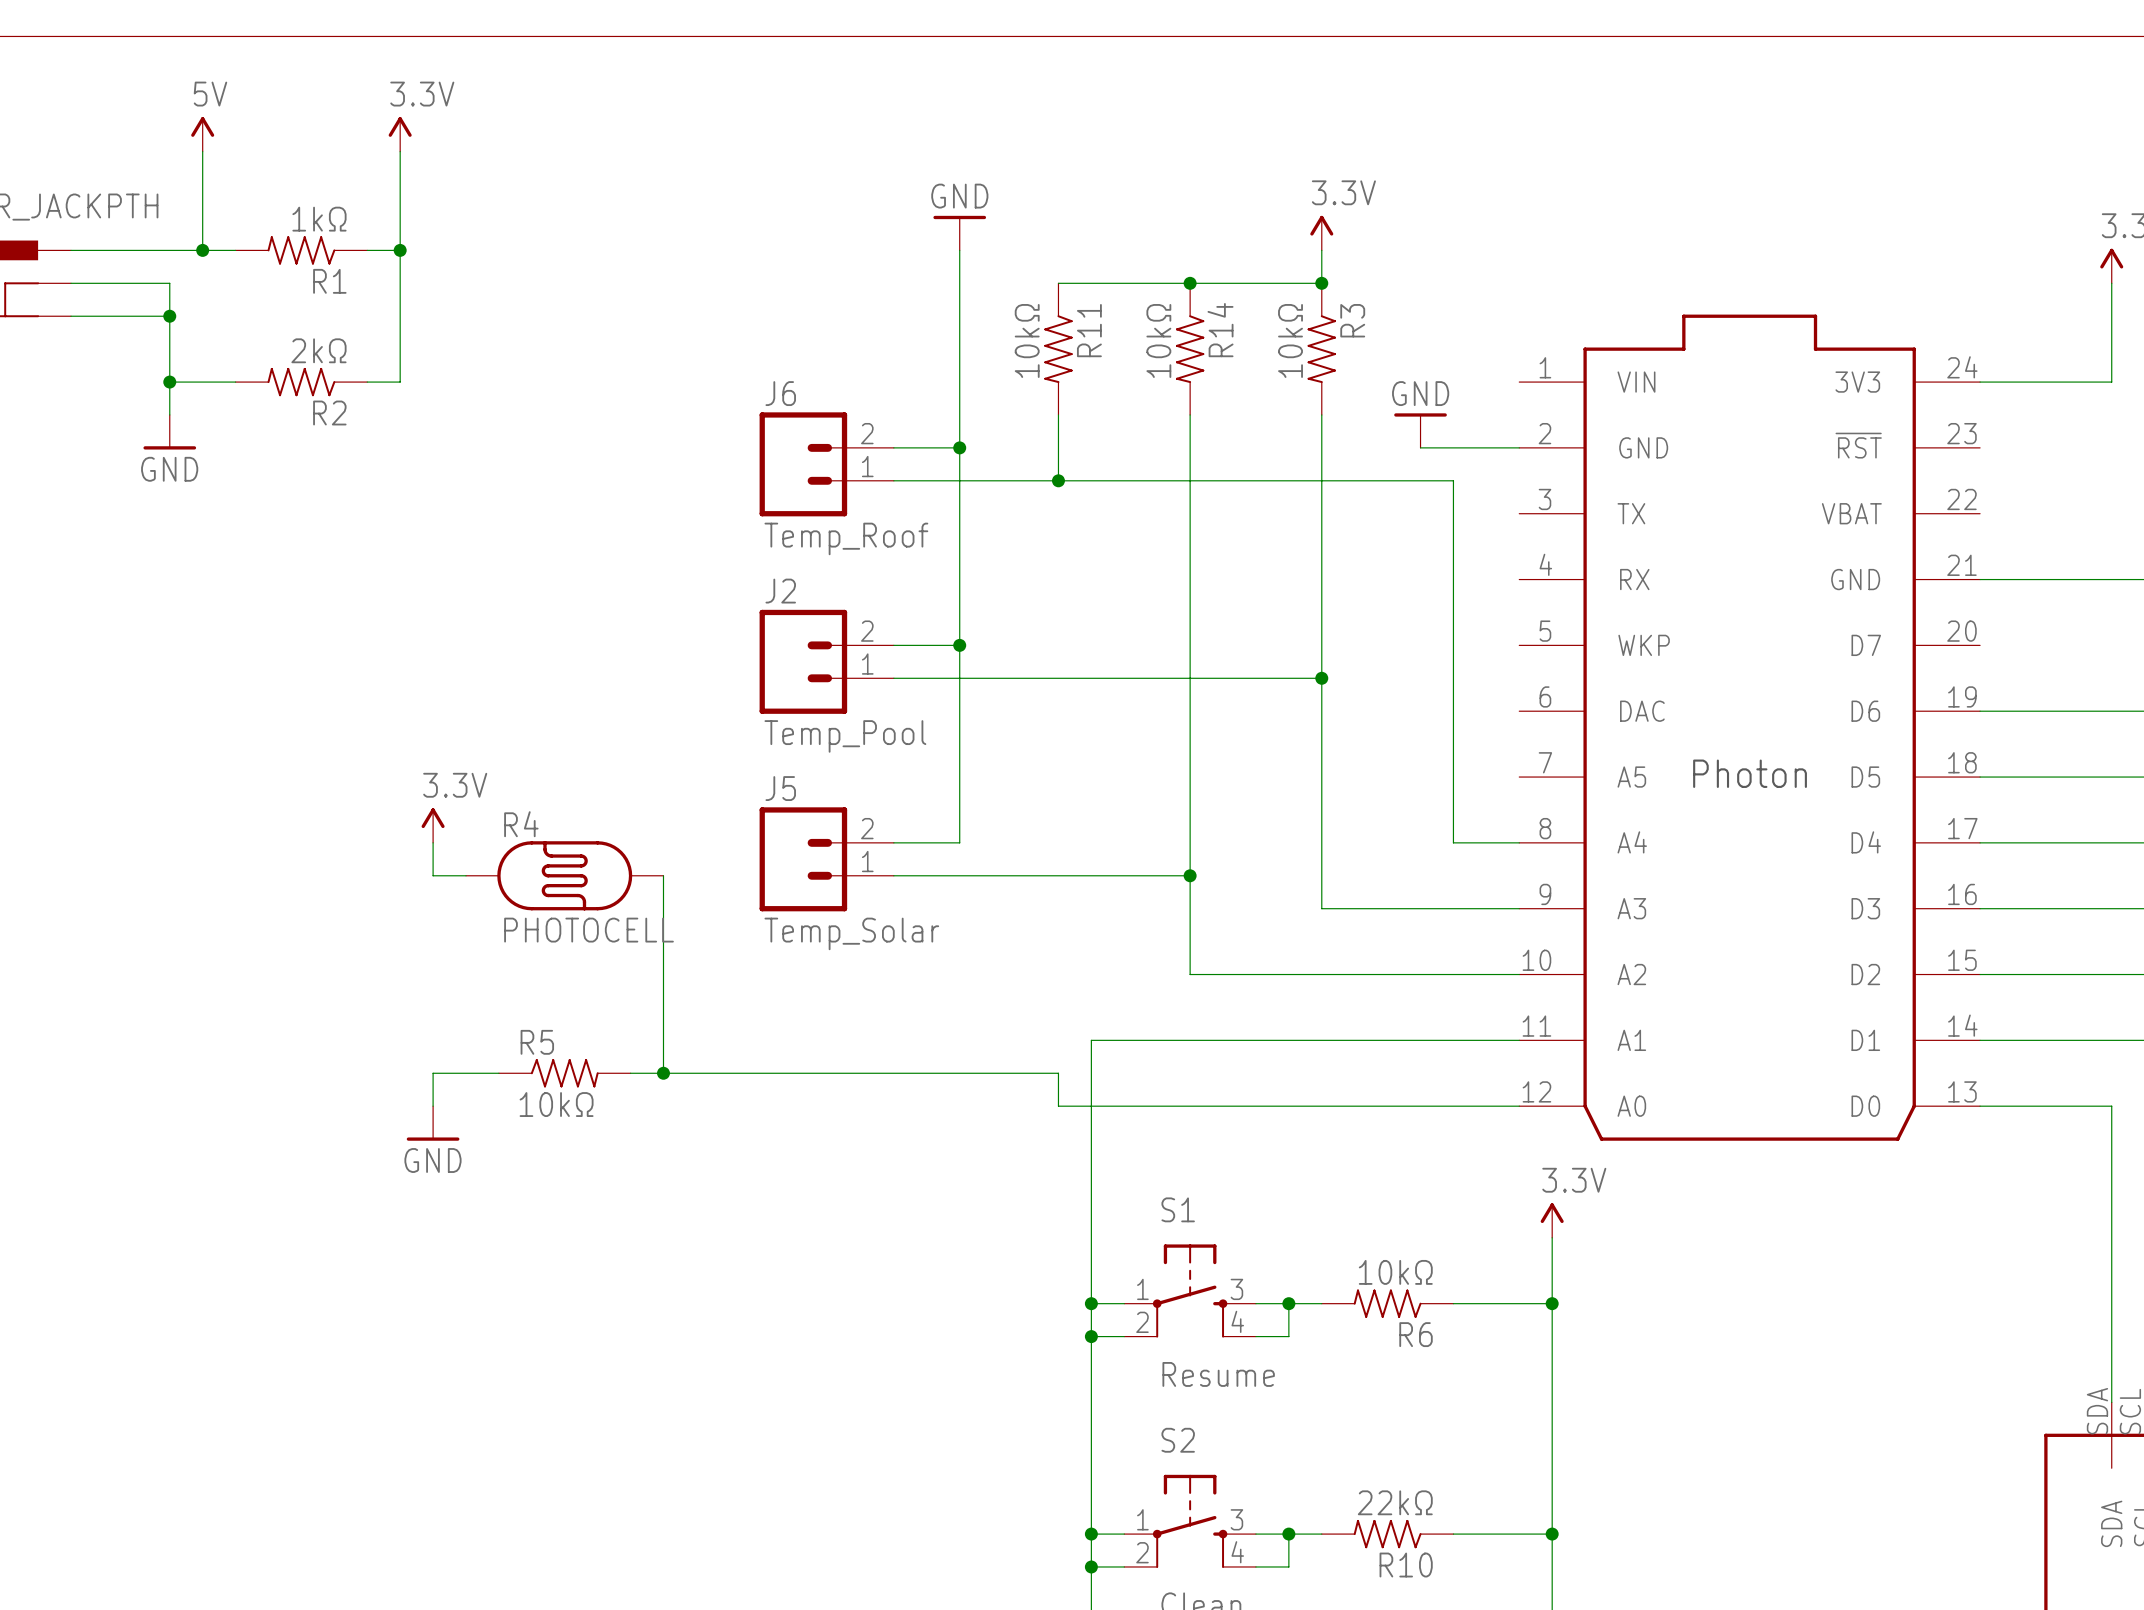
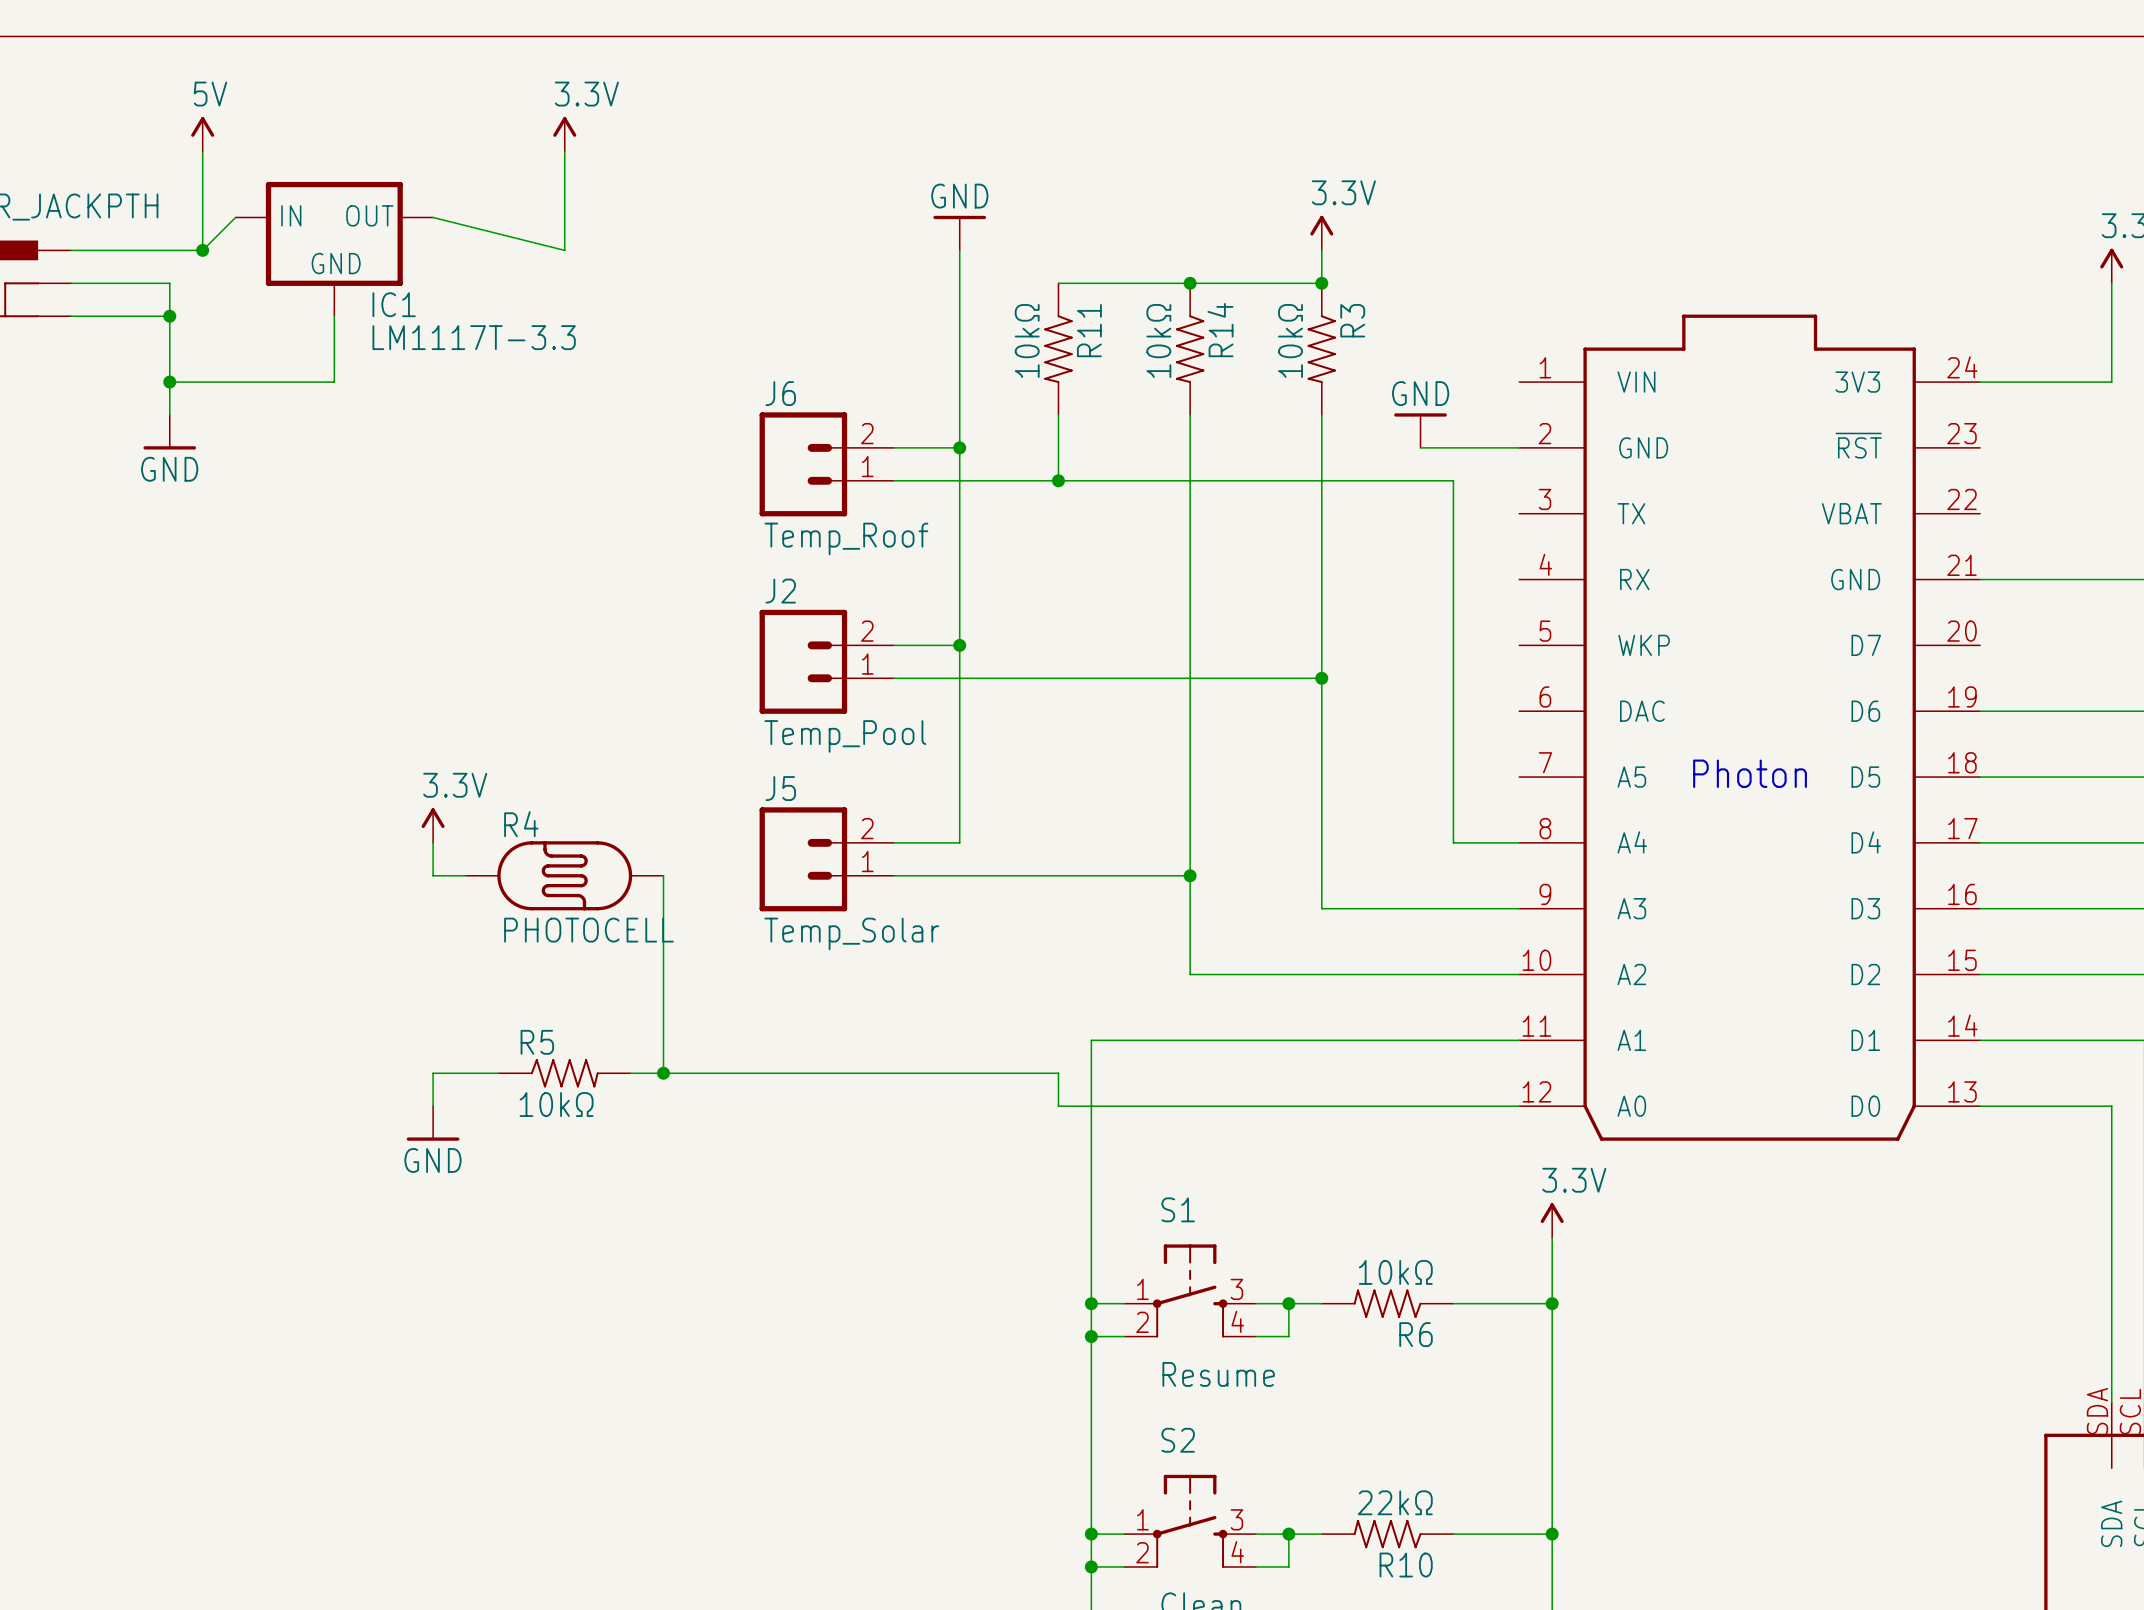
power symbol position: 3.3V (400, 134) -> 3.3V (564, 134)
wire: (400, 151) (400, 382) (367, 382) -> none
wire: none -> (564, 151) (564, 250) (433, 217)
IC1: none -> LM1117T-3.3 (334, 249)
wire: (202, 250) (235, 250) -> (202, 250) (235, 217)
R1: 1kΩ (301, 250) -> none
wire: (367, 250) (400, 250) -> none
junction: (400, 250) -> none
wire: none -> (334, 316) (334, 382) (235, 382)
R2: 2kΩ (301, 382) -> none

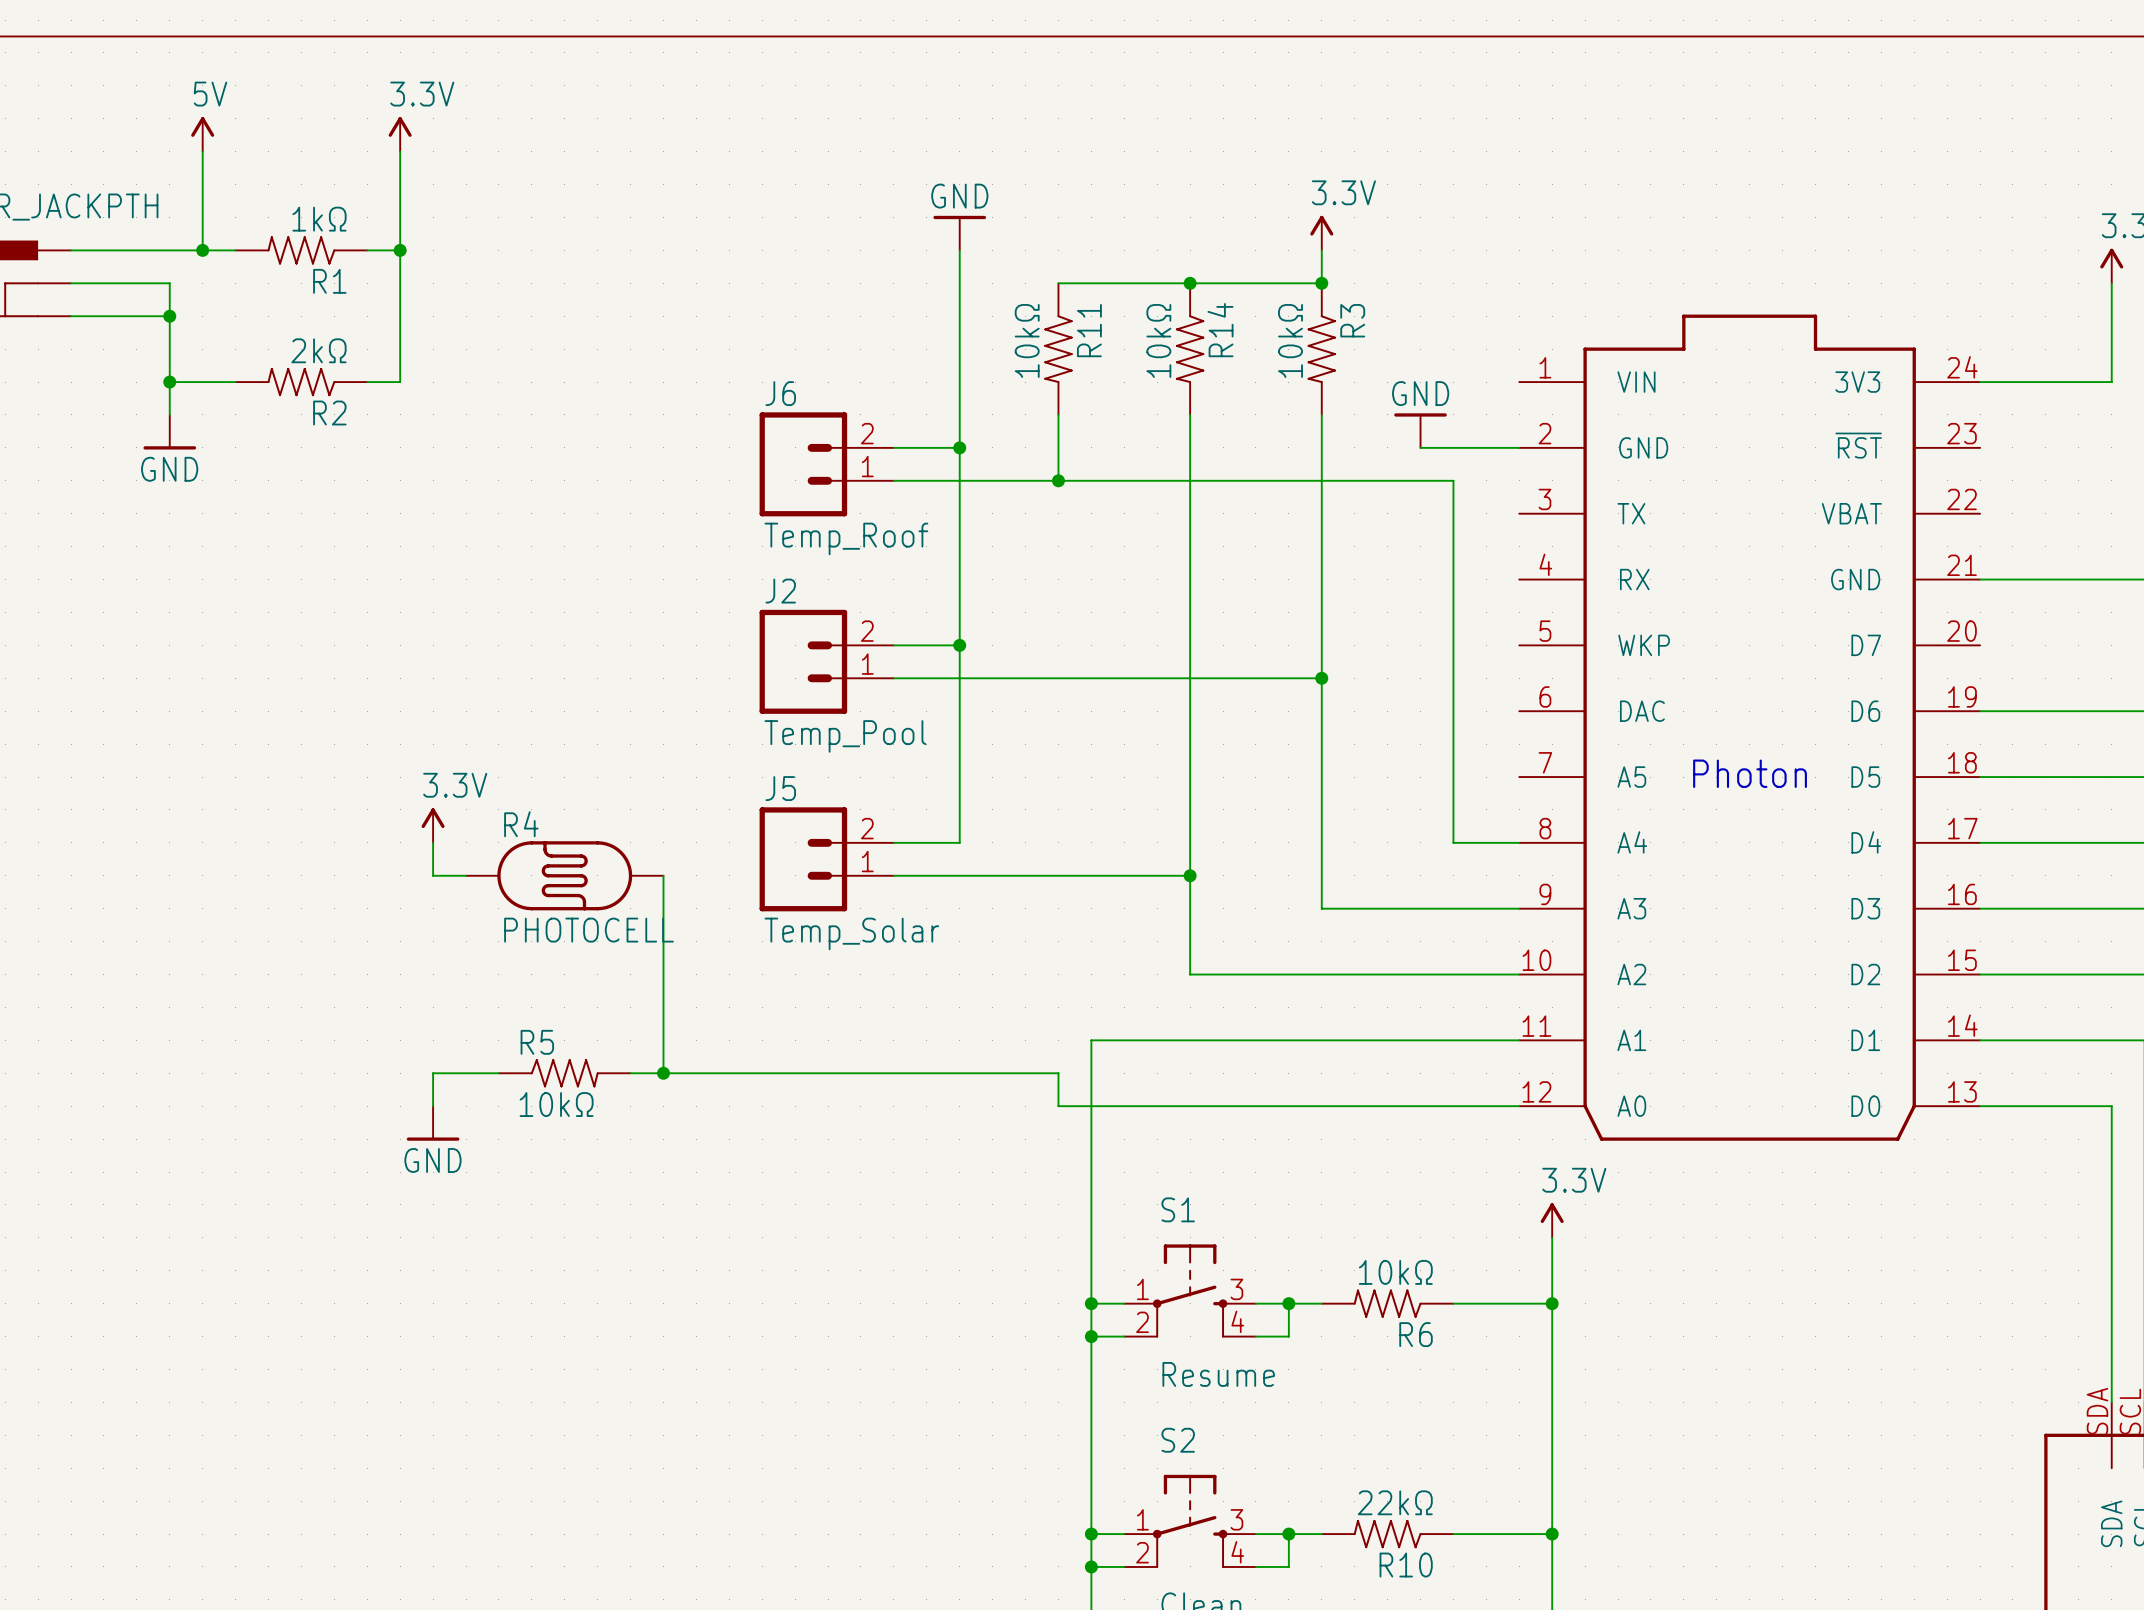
power symbol position: 3.3V (564, 134) -> 3.3V (400, 134)
wire: none -> (400, 151) (400, 382) (367, 382)
wire: (564, 151) (564, 250) (433, 217) -> none
wire: (235, 217) (202, 250) -> (235, 250) (202, 250)
IC1: LM1117T-3.3 (334, 249) -> none
R1: none -> 1kΩ (301, 250)
wire: none -> (367, 250) (400, 250)
junction: none -> (400, 250)
wire: (334, 316) (334, 382) (235, 382) -> none
R2: none -> 2kΩ (301, 382)

